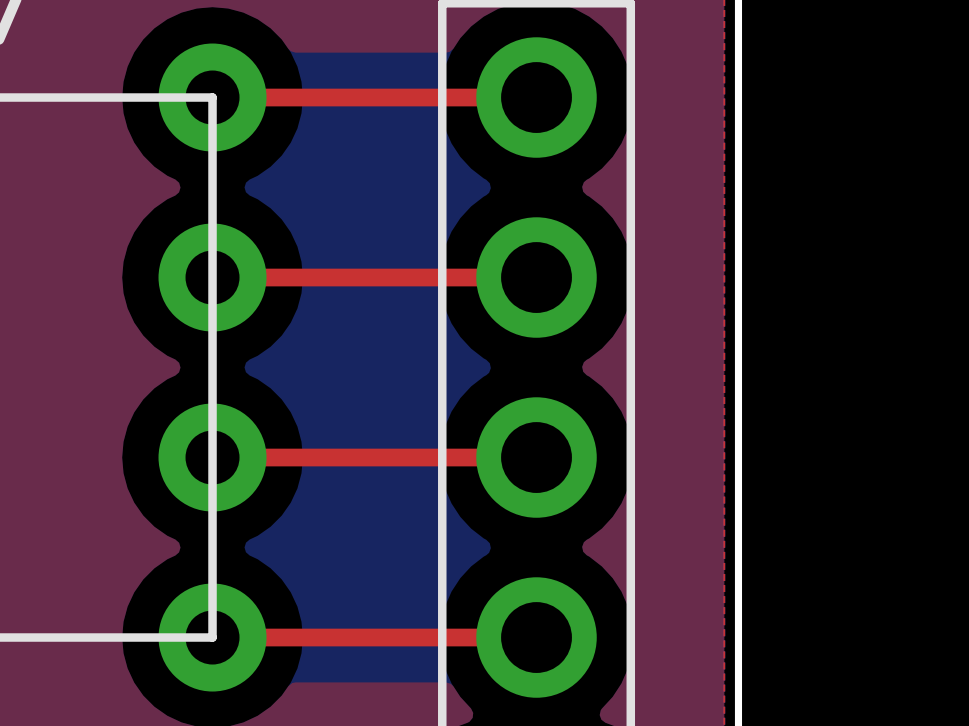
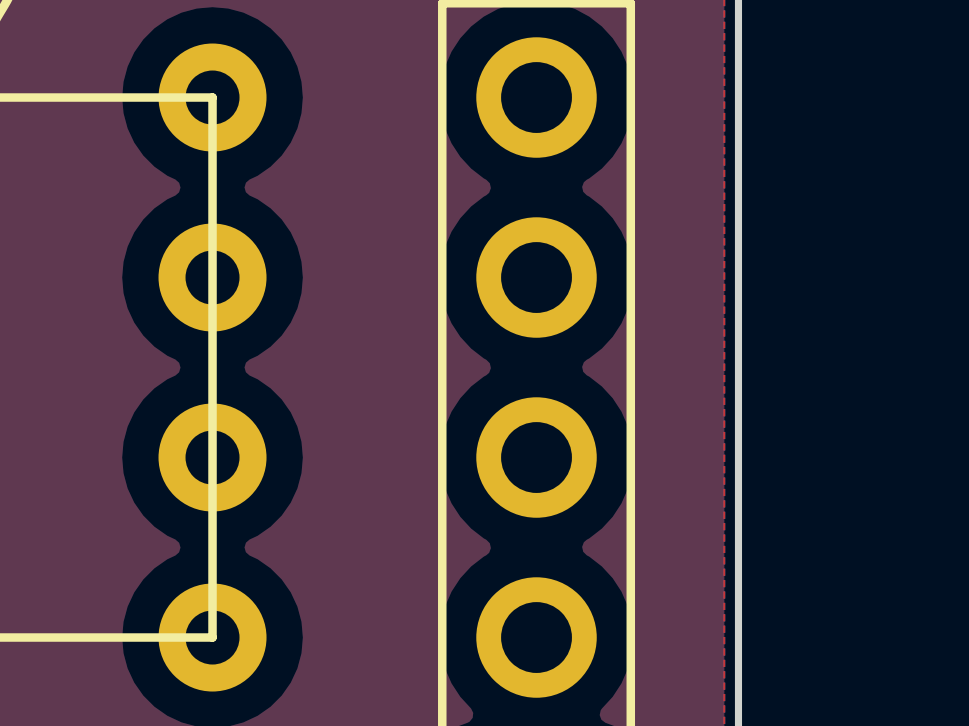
top track: (212, 97) (536, 97) -> none
top track: (212, 277) (536, 277) -> none
top track: (212, 457) (536, 457) -> none
top track: (212, 637) (536, 637) -> none

